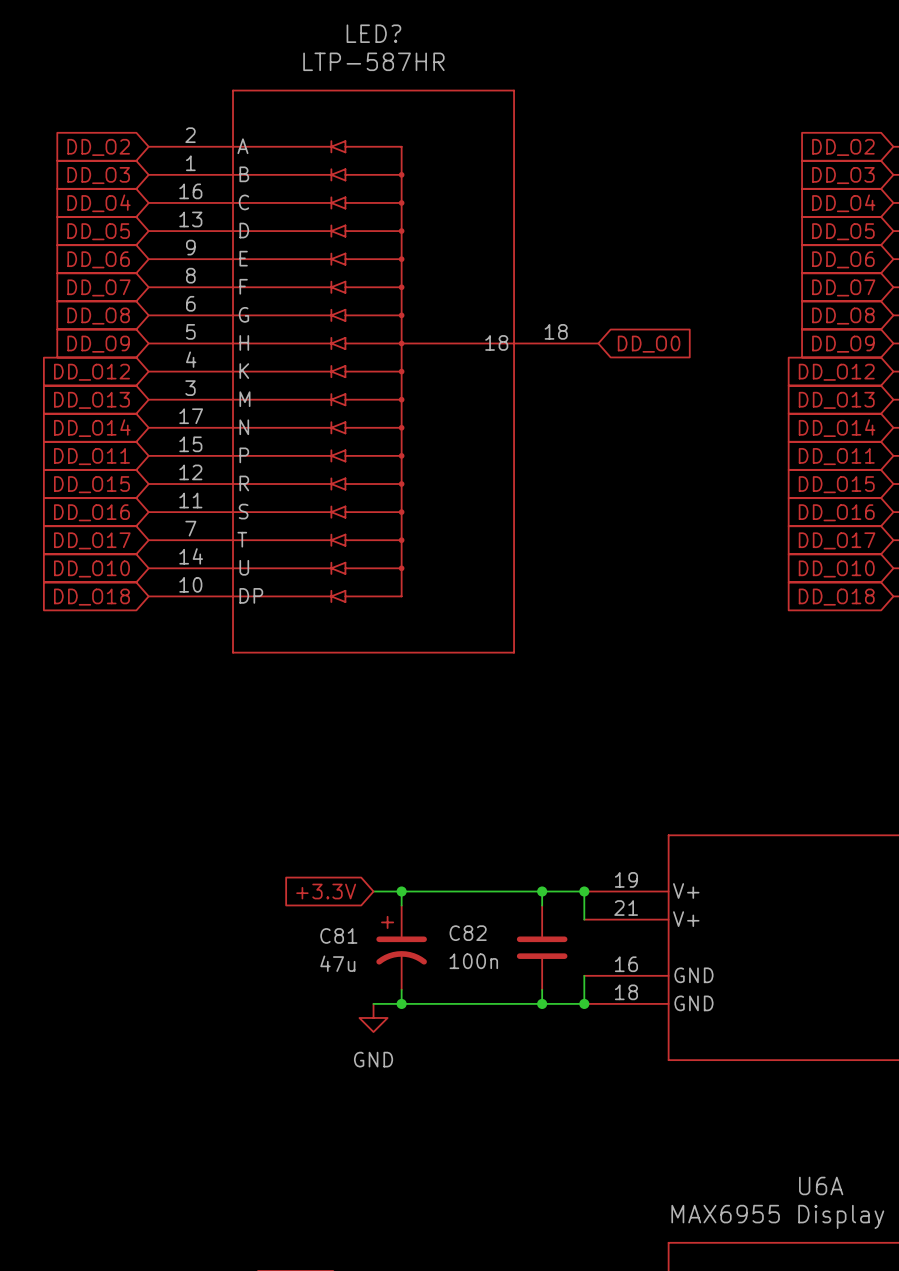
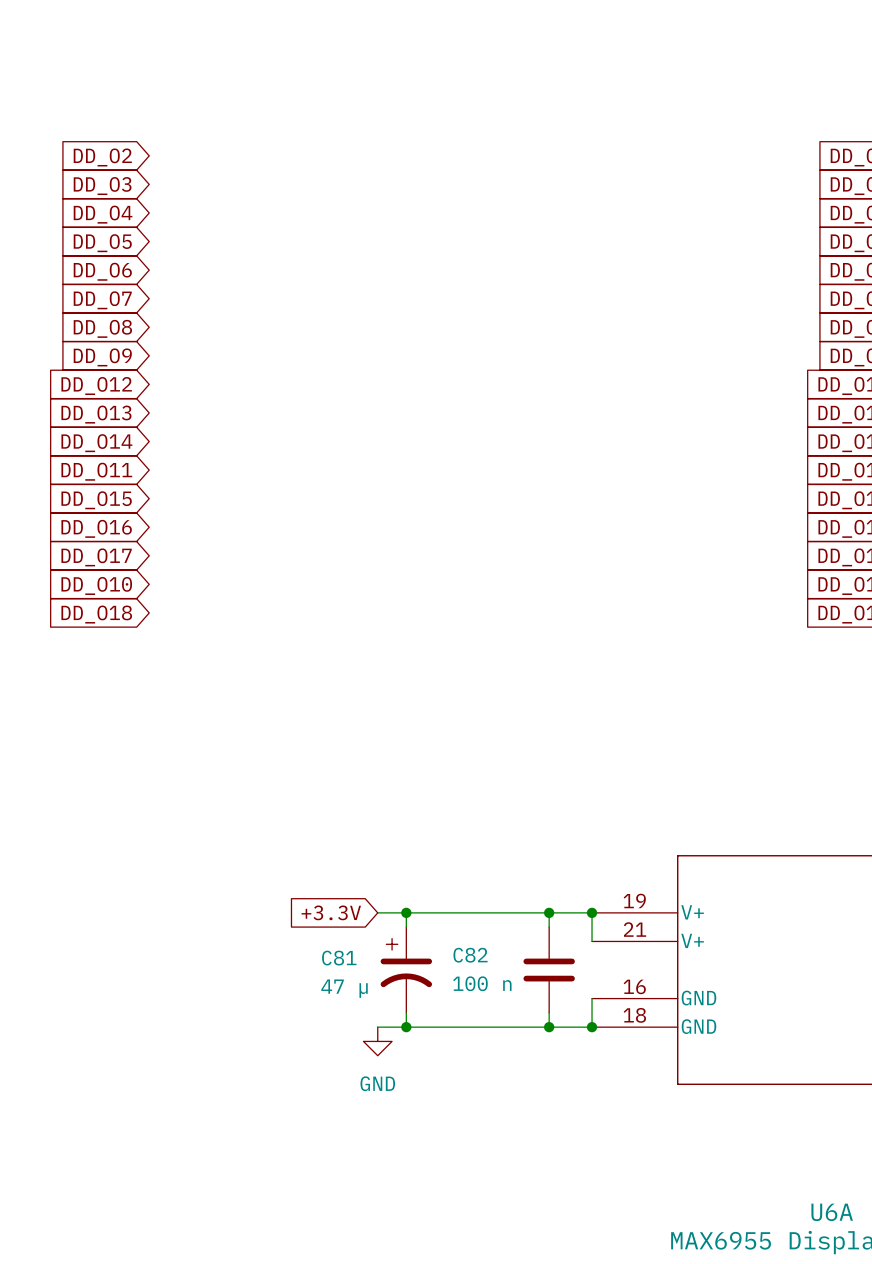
global label: DD_O0 (649, 344) -> none
LED?: LTP-587HR (373, 371) -> none
C82 value: 100n (473, 961) -> 100 n (482, 983)
C81 value: 47u (337, 963) -> 47 µ (344, 988)

